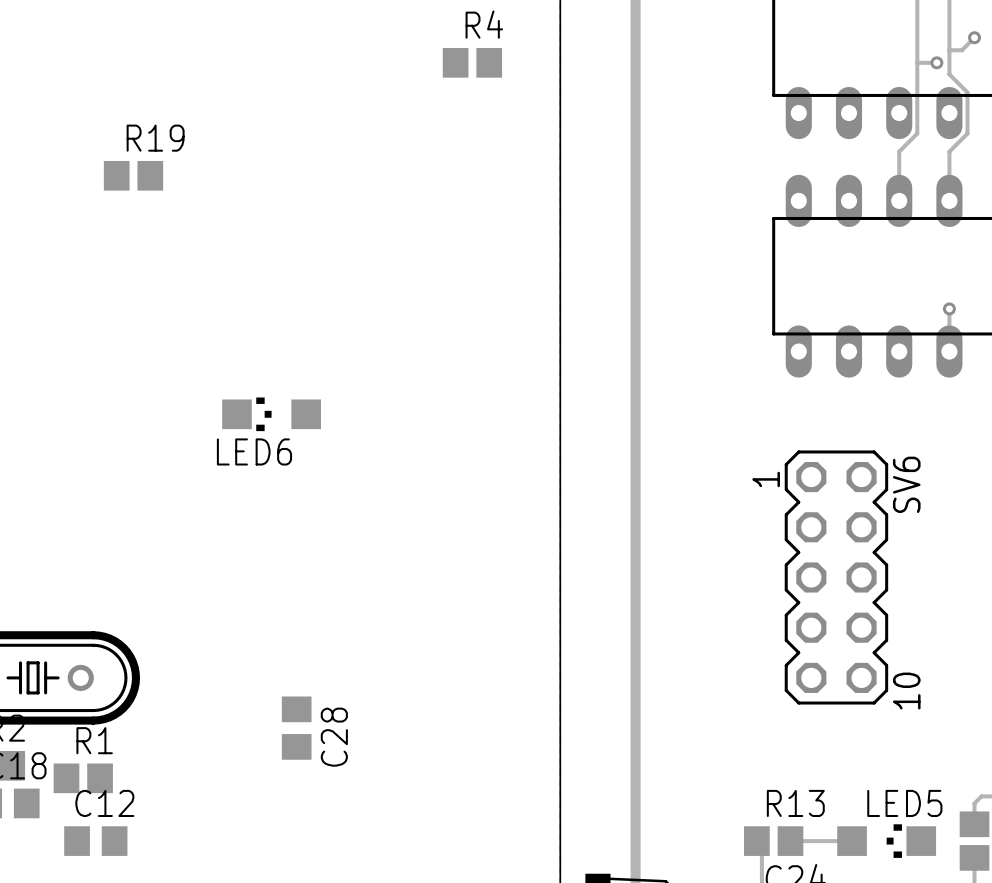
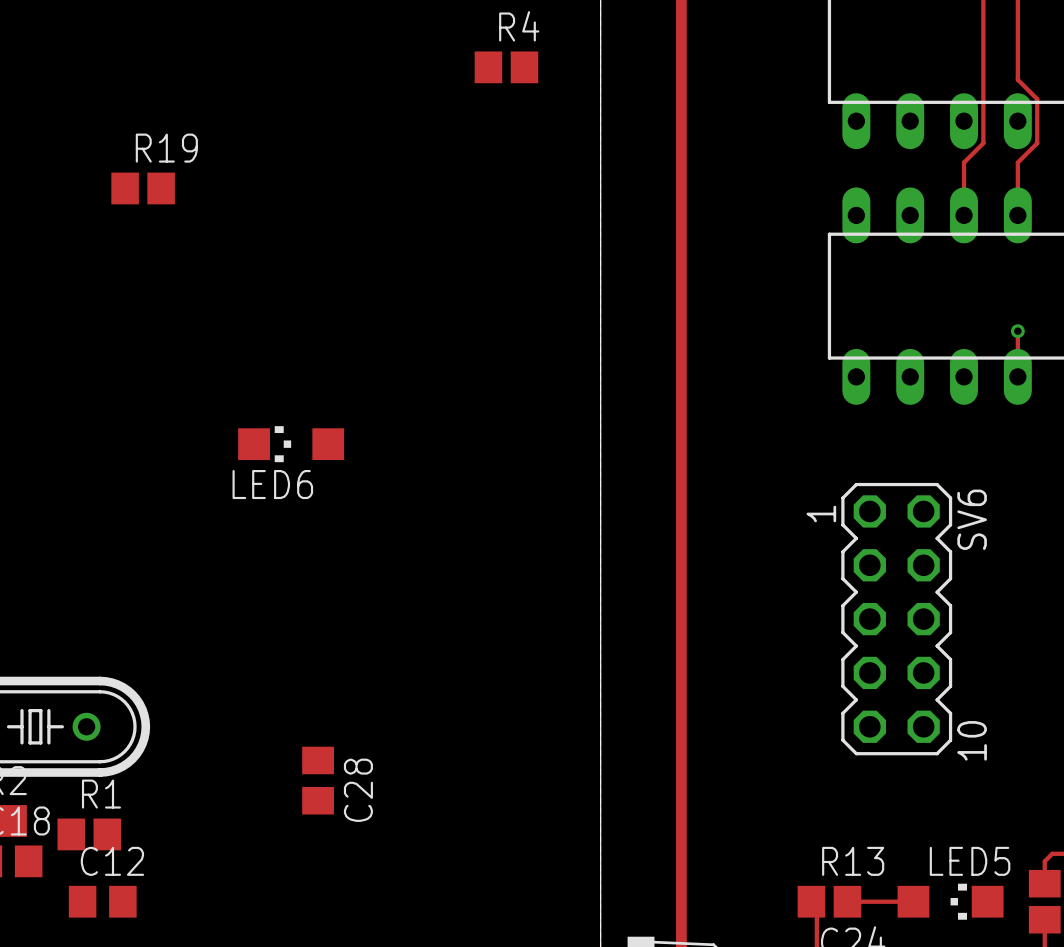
track: (974, 37) (961, 50) (949, 50) -> none
via: (974, 37) -> none
track: (917, 62) (936, 62) -> none
via: (936, 62) -> none

